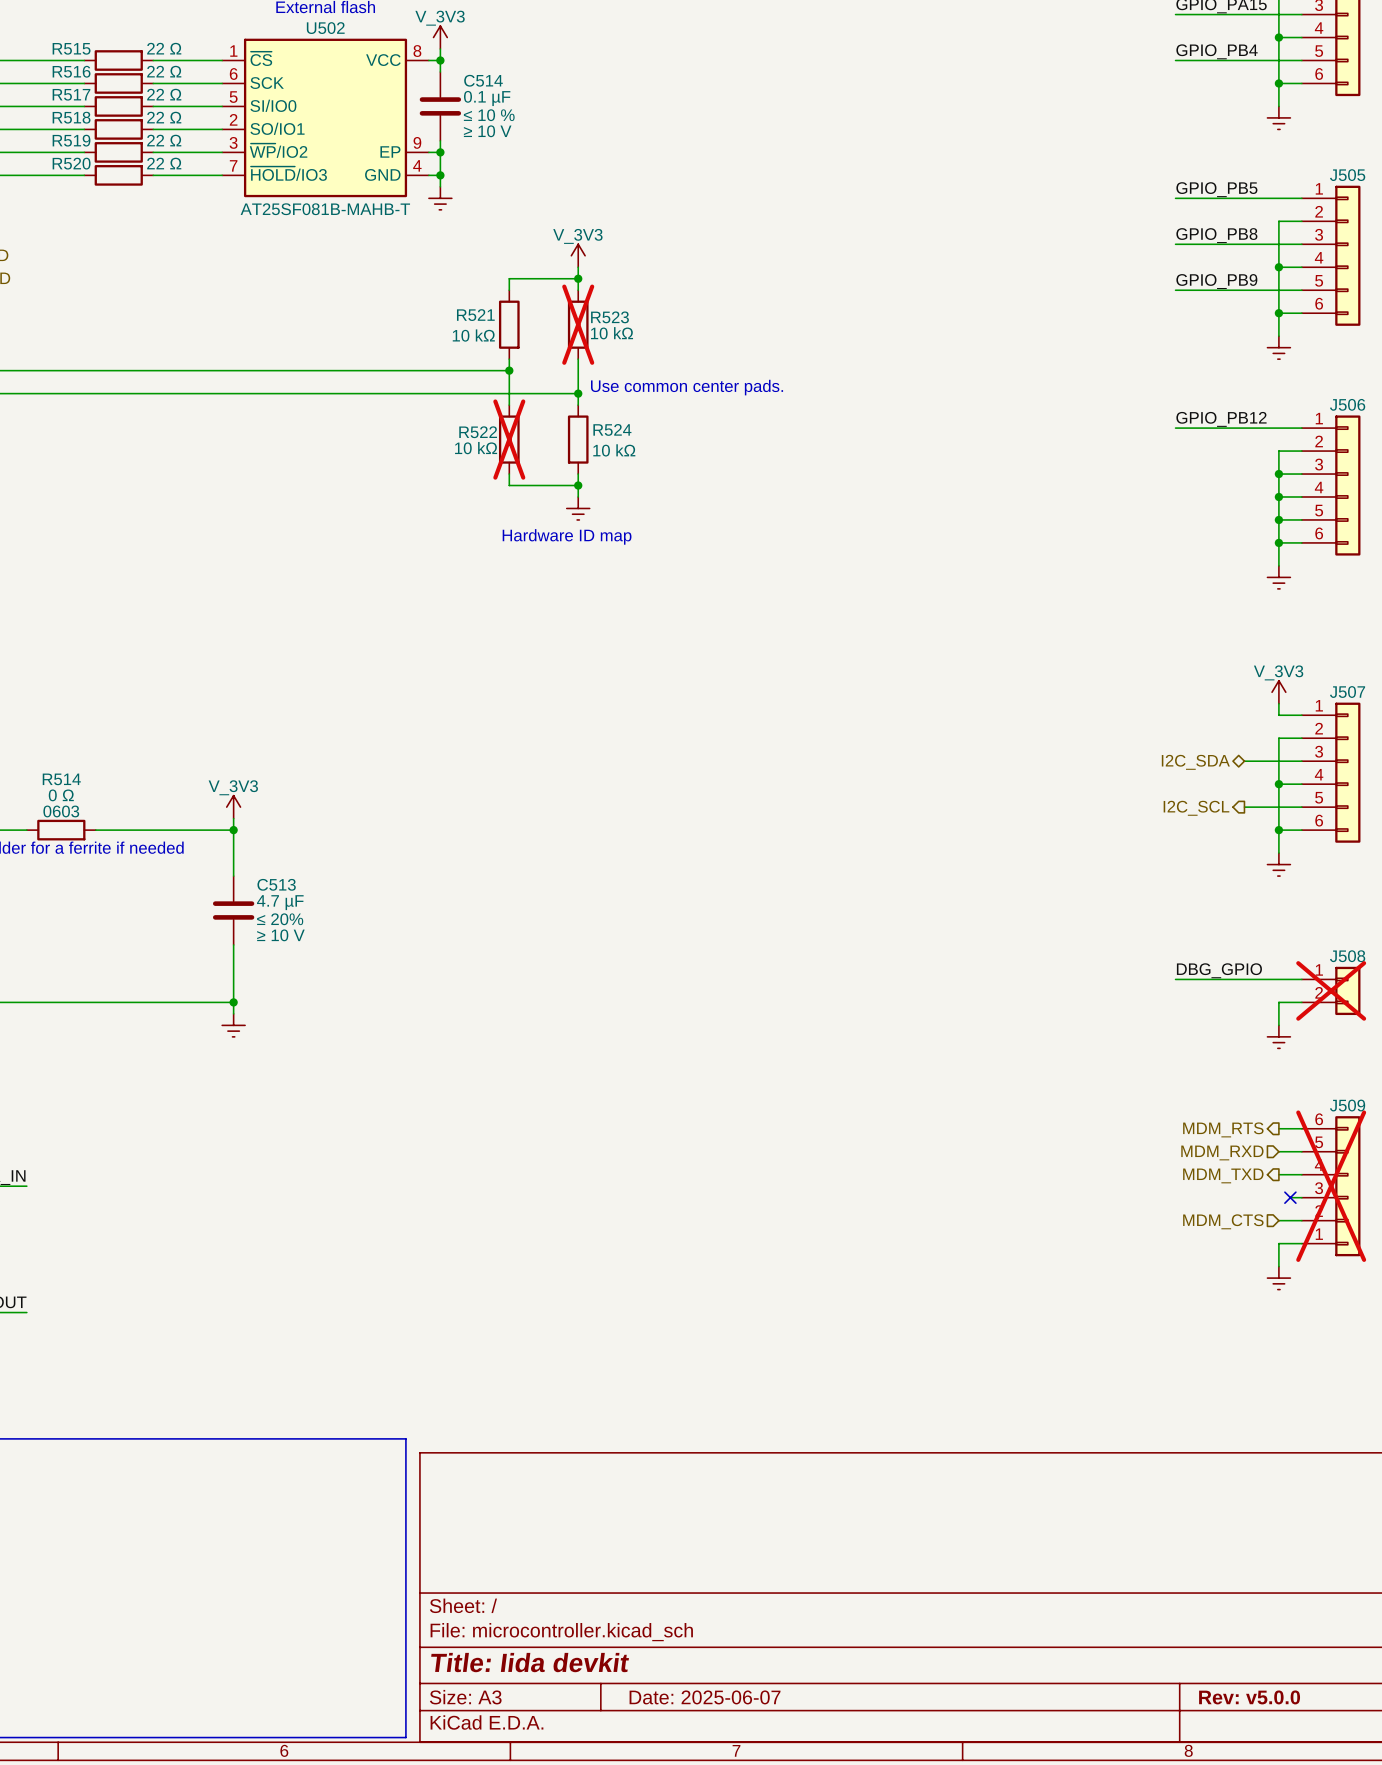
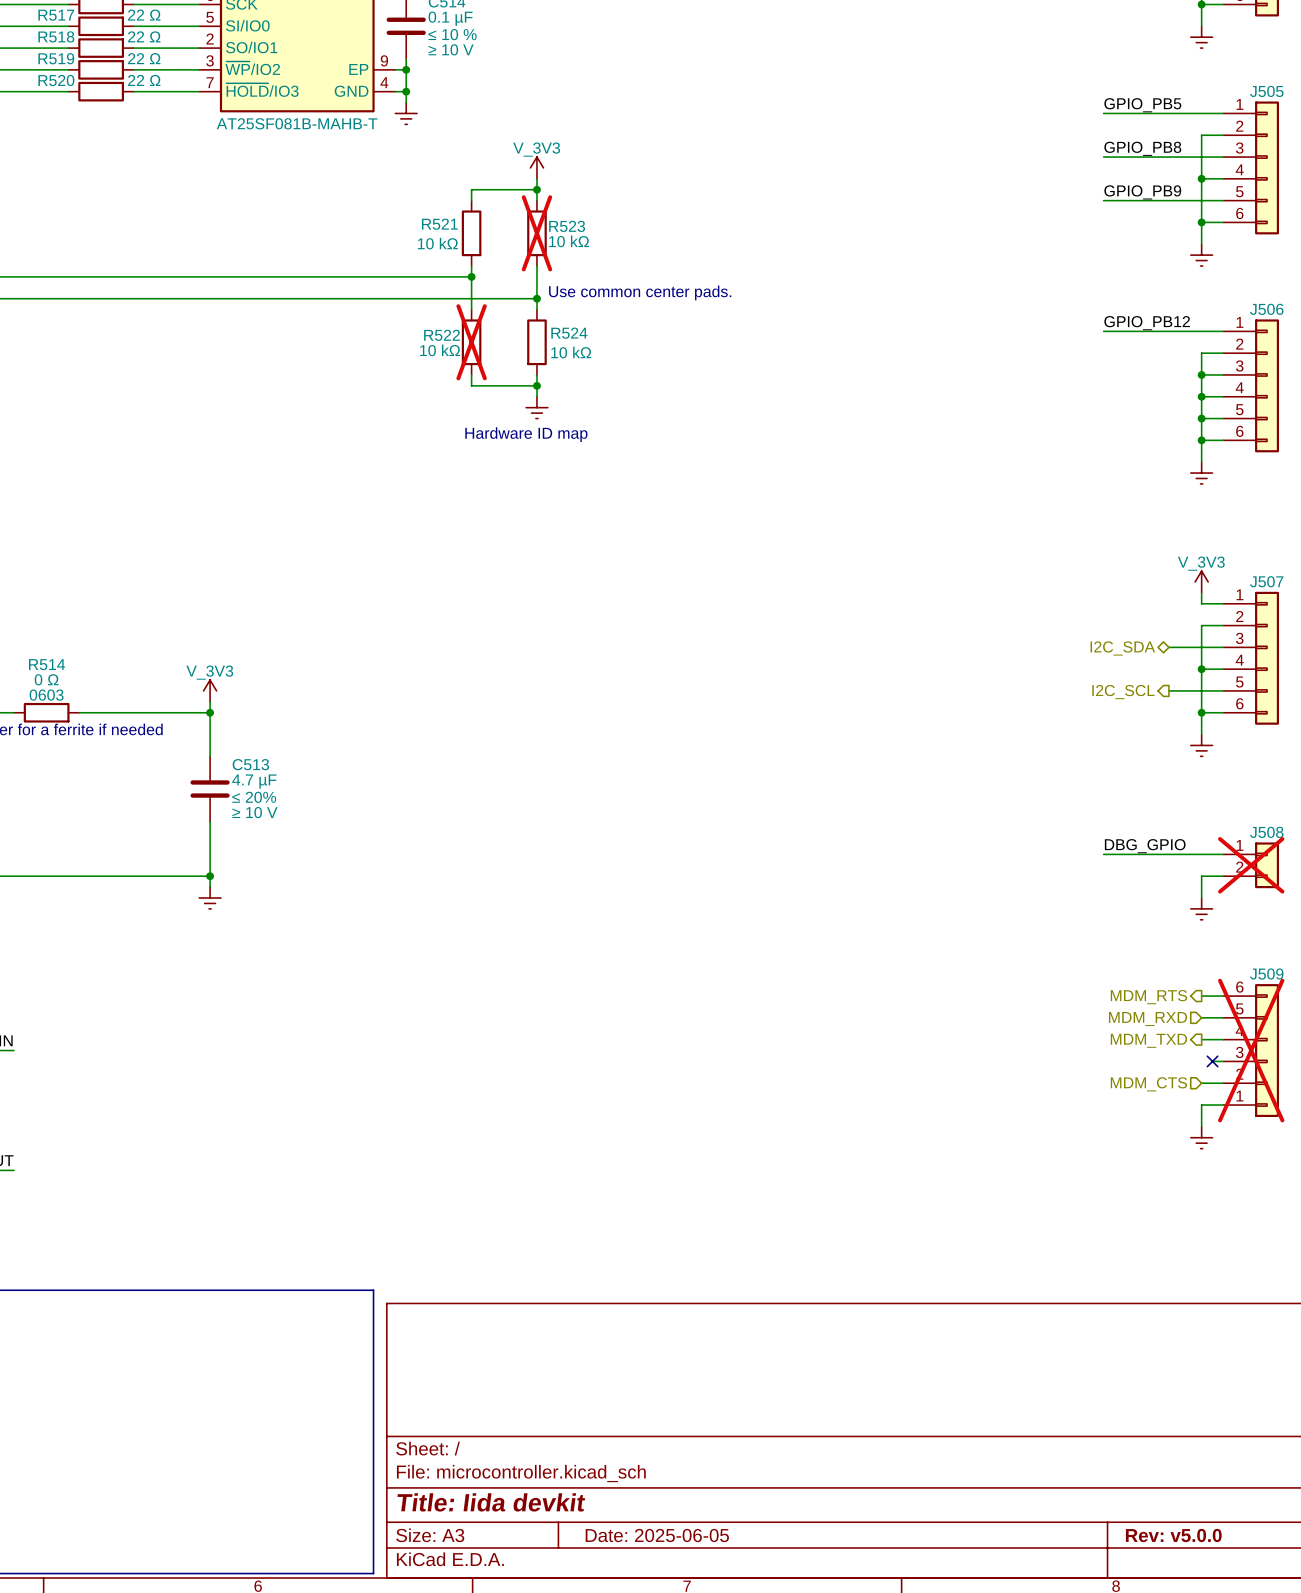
title block: Date: 2025-06-07 (705, 1697) -> Date: 2025-06-05 (657, 1535)

